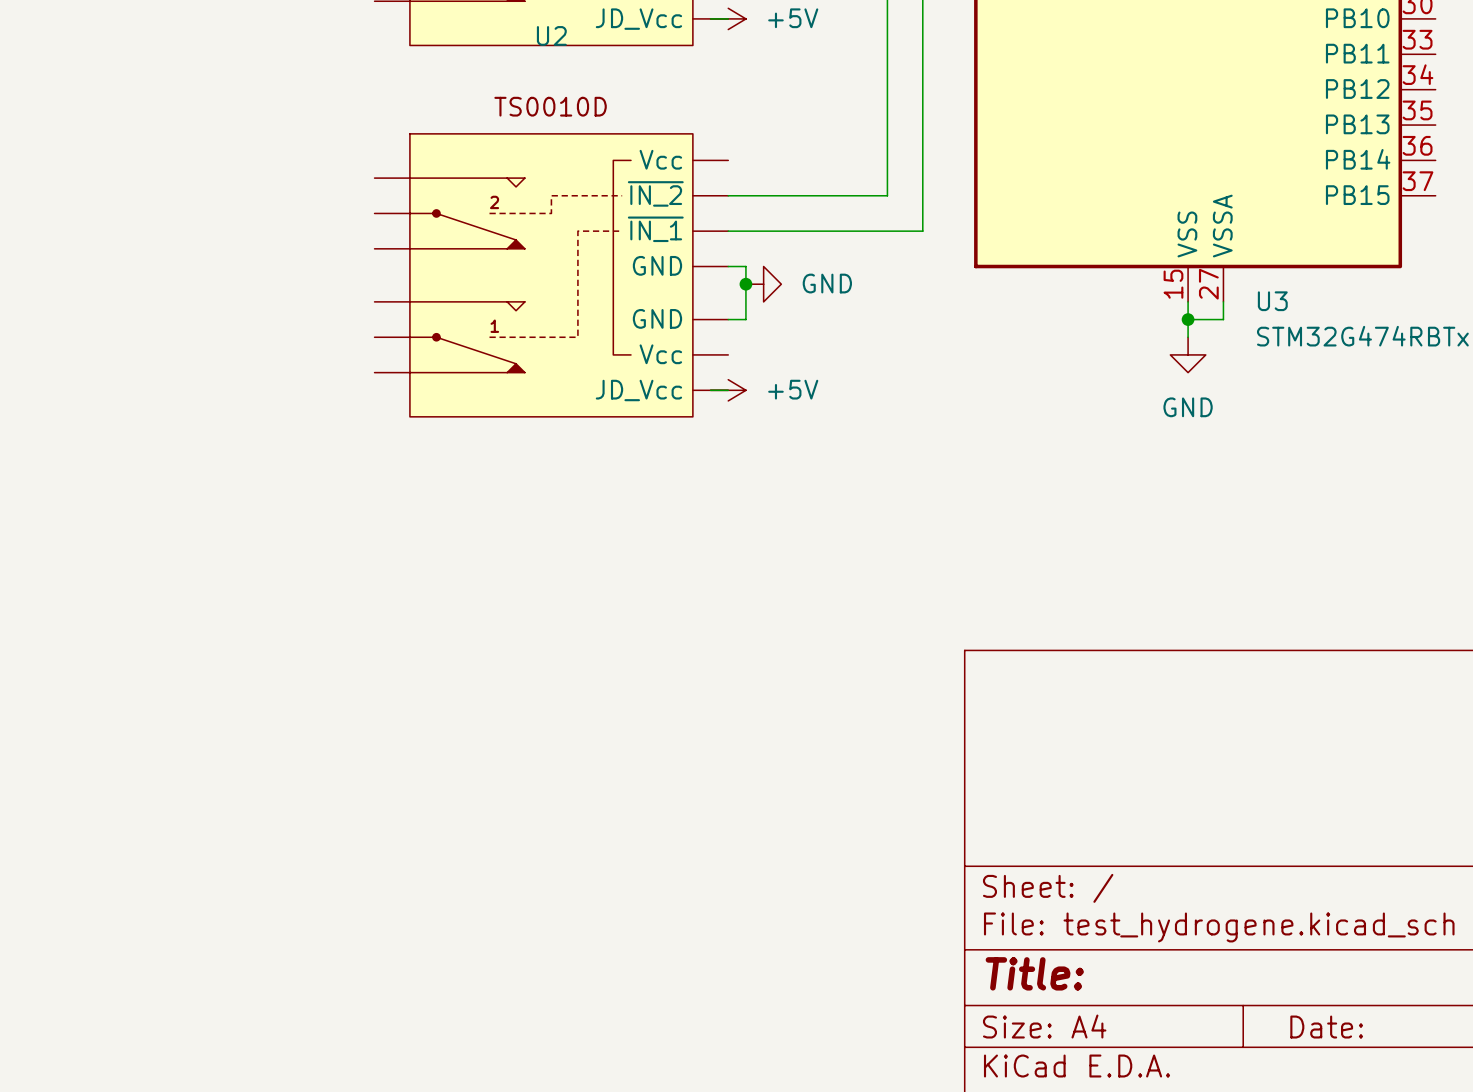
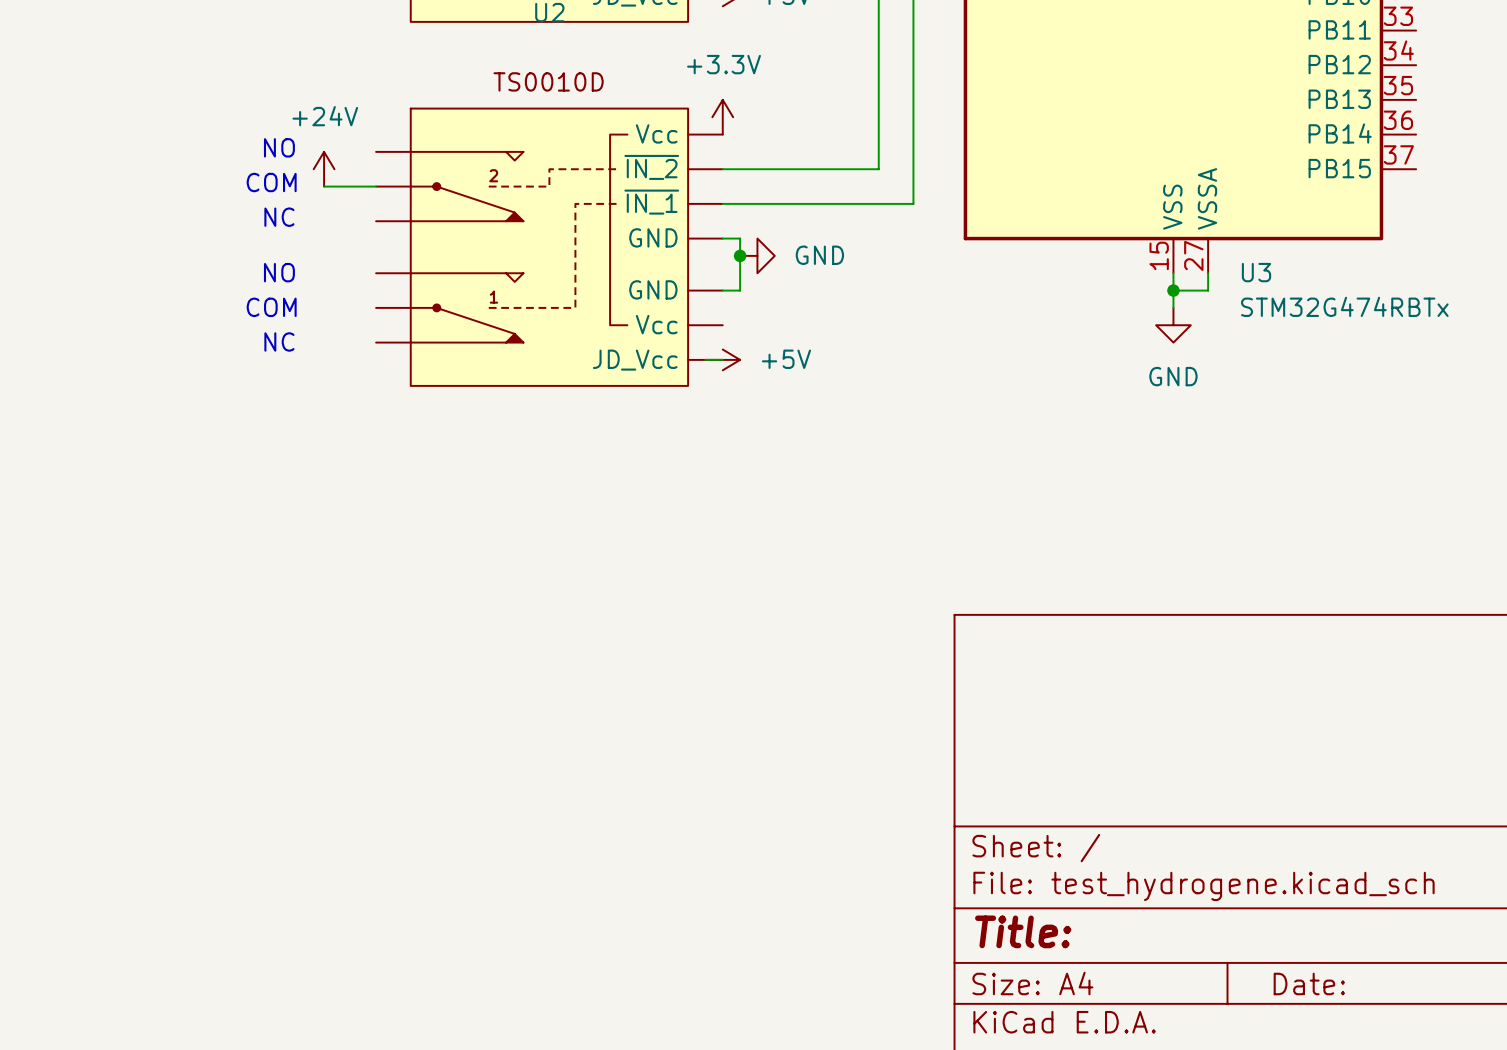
power symbol: none -> +3.3V (722, 117)
text: none -> NO (279, 147)
power symbol: none -> +24V (324, 169)
text: none -> COM (271, 182)
wire: none -> (324, 186) (376, 186)
text: none -> NC (279, 217)
text: none -> NO (279, 272)
text: none -> COM (271, 307)
text: none -> NC (279, 341)

